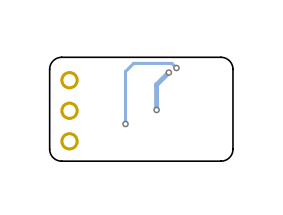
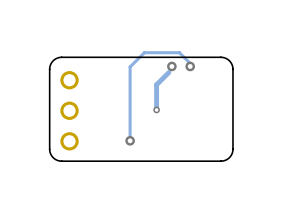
track: (133, 63) (171, 63) (176, 67) -> (133, 63) (144, 52) (179, 52) (190, 63) (190, 66)
track: (130, 66) (125, 71) (125, 124) -> (130, 66) (130, 140)
via: none -> (171, 66)
via: none -> (190, 66)
via: (176, 67) -> none
via: (168, 72) -> none
via: (125, 124) -> none
via: none -> (130, 140)

